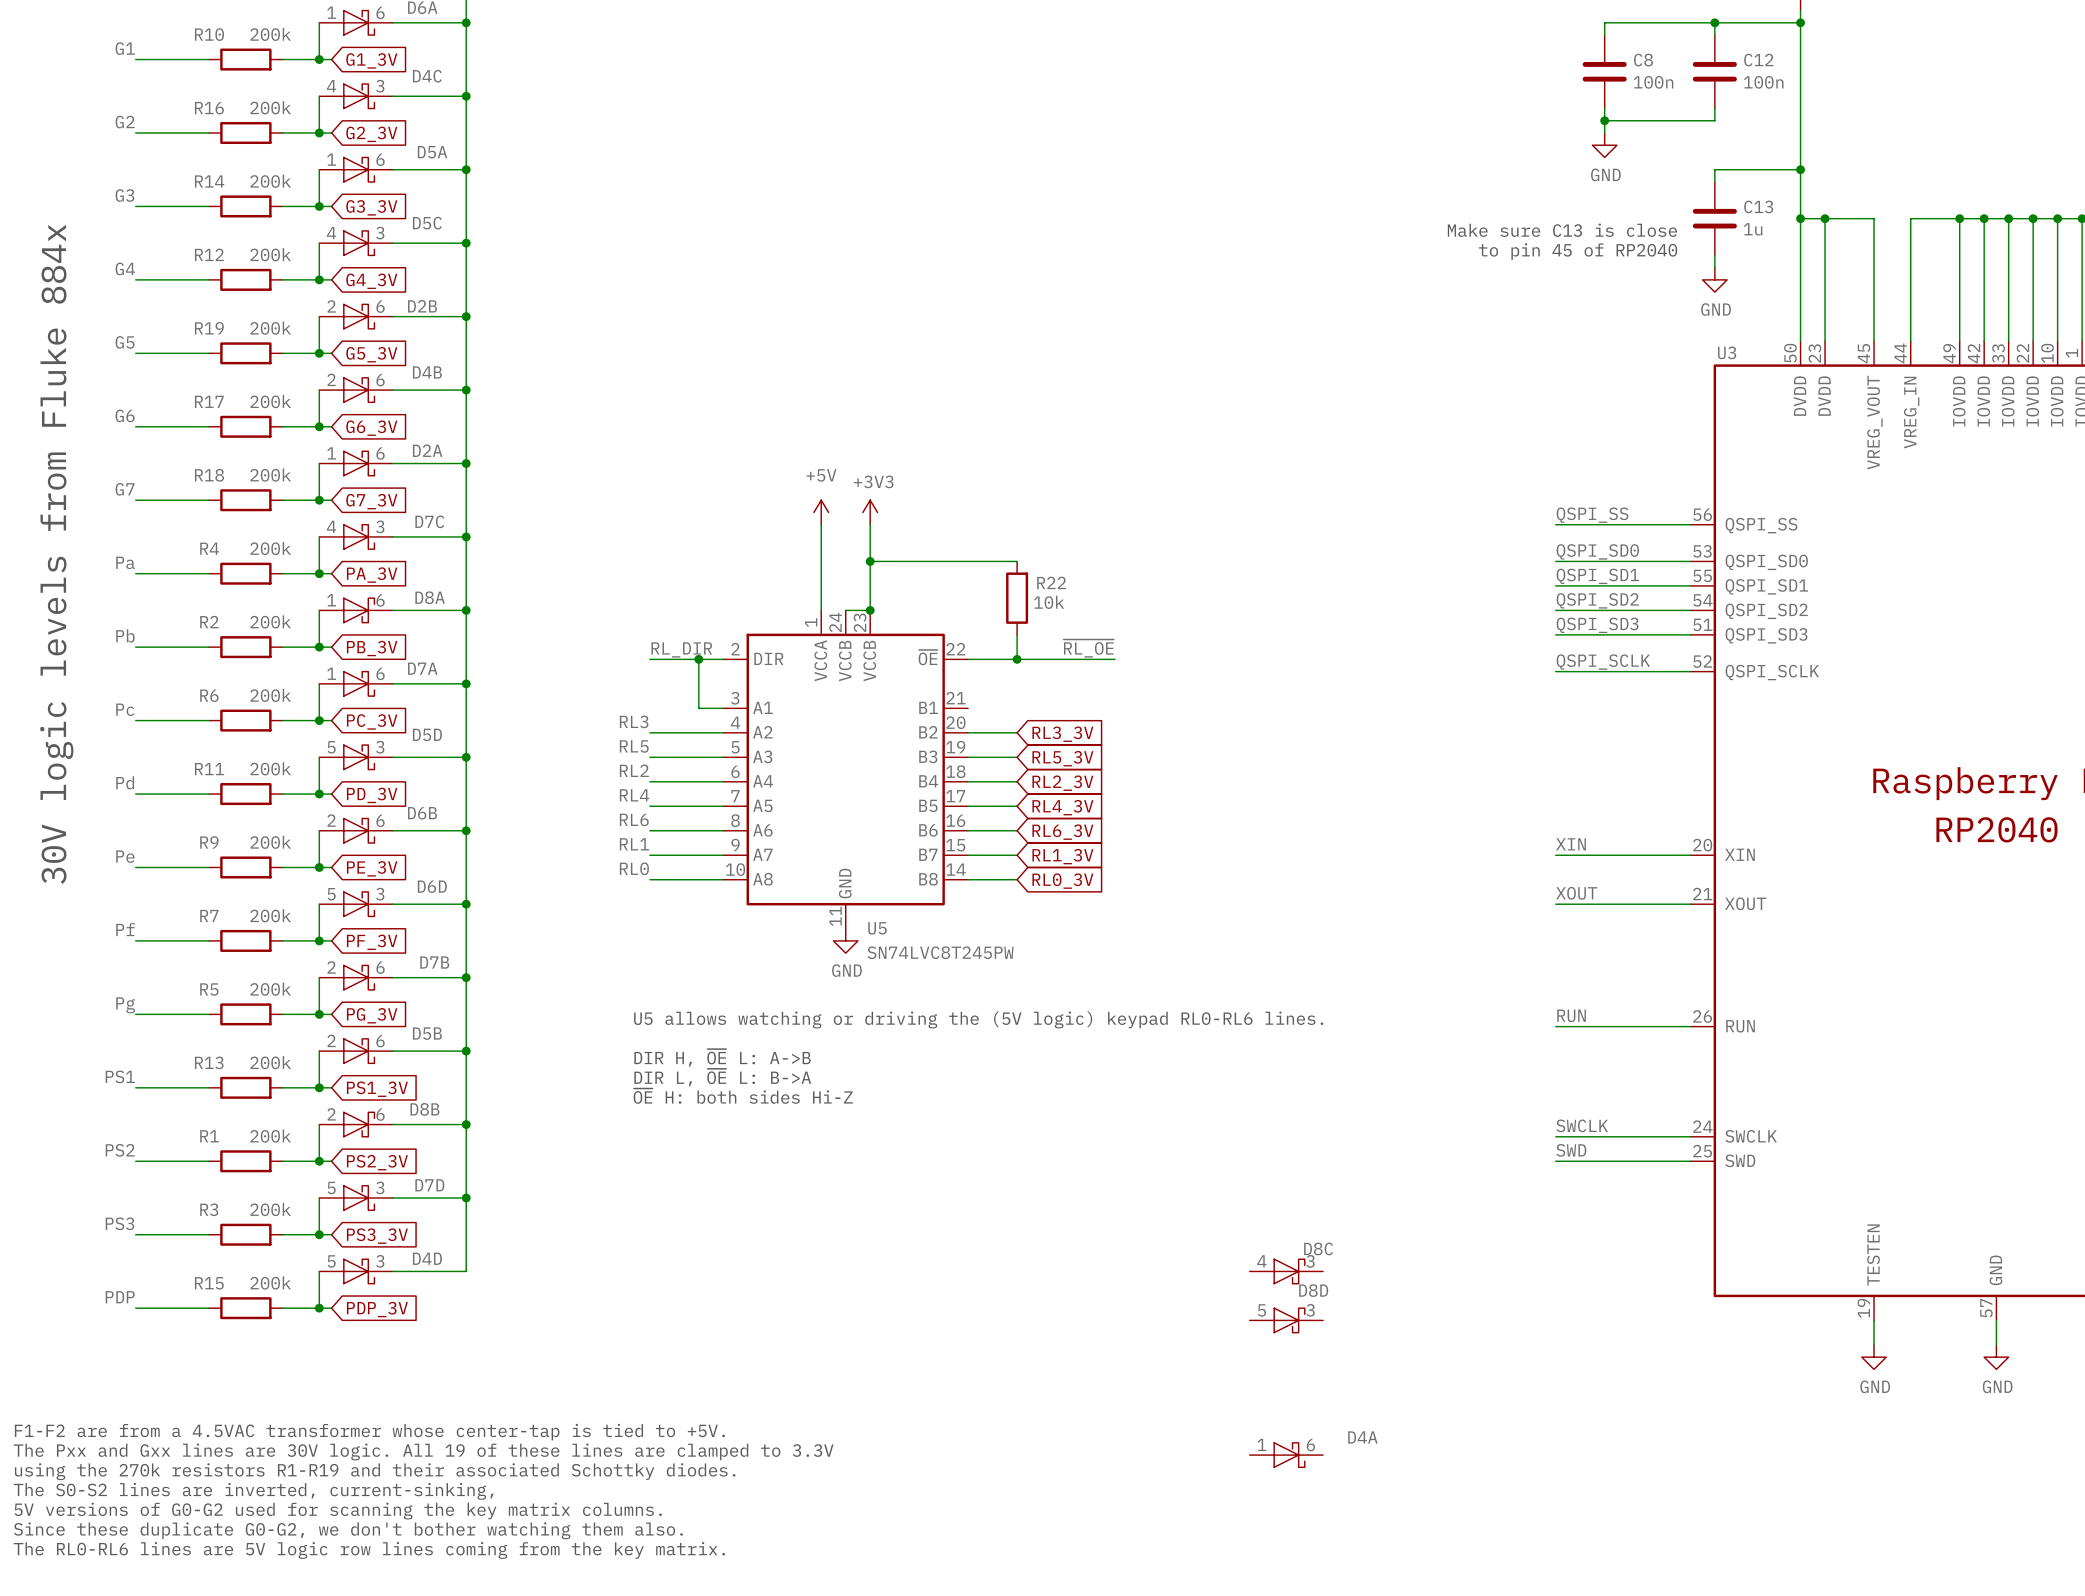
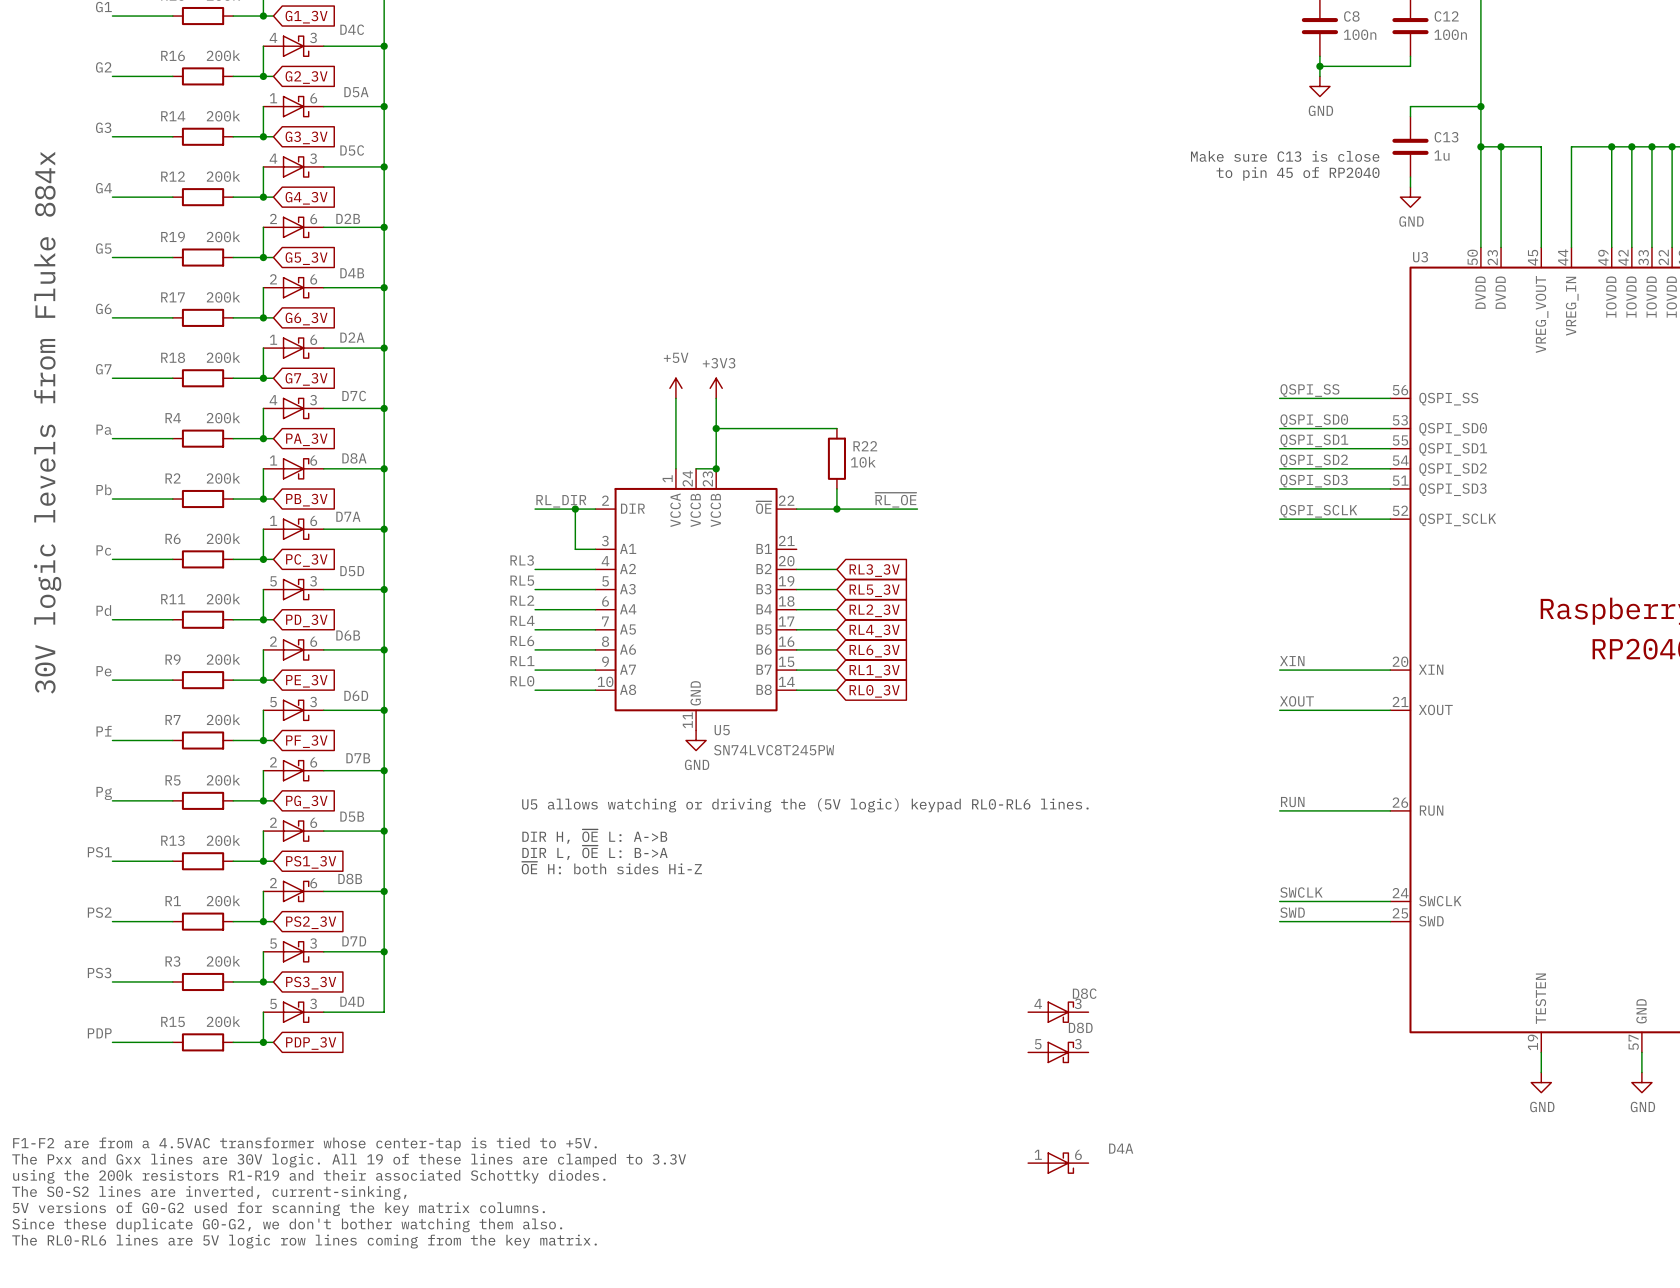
text: using the 270k resistors R1-R19 and their associated Schottky diodes. (375, 1471) -> using the 200k resistors R1-R19 and their associated Schottky diodes. (309, 1176)

